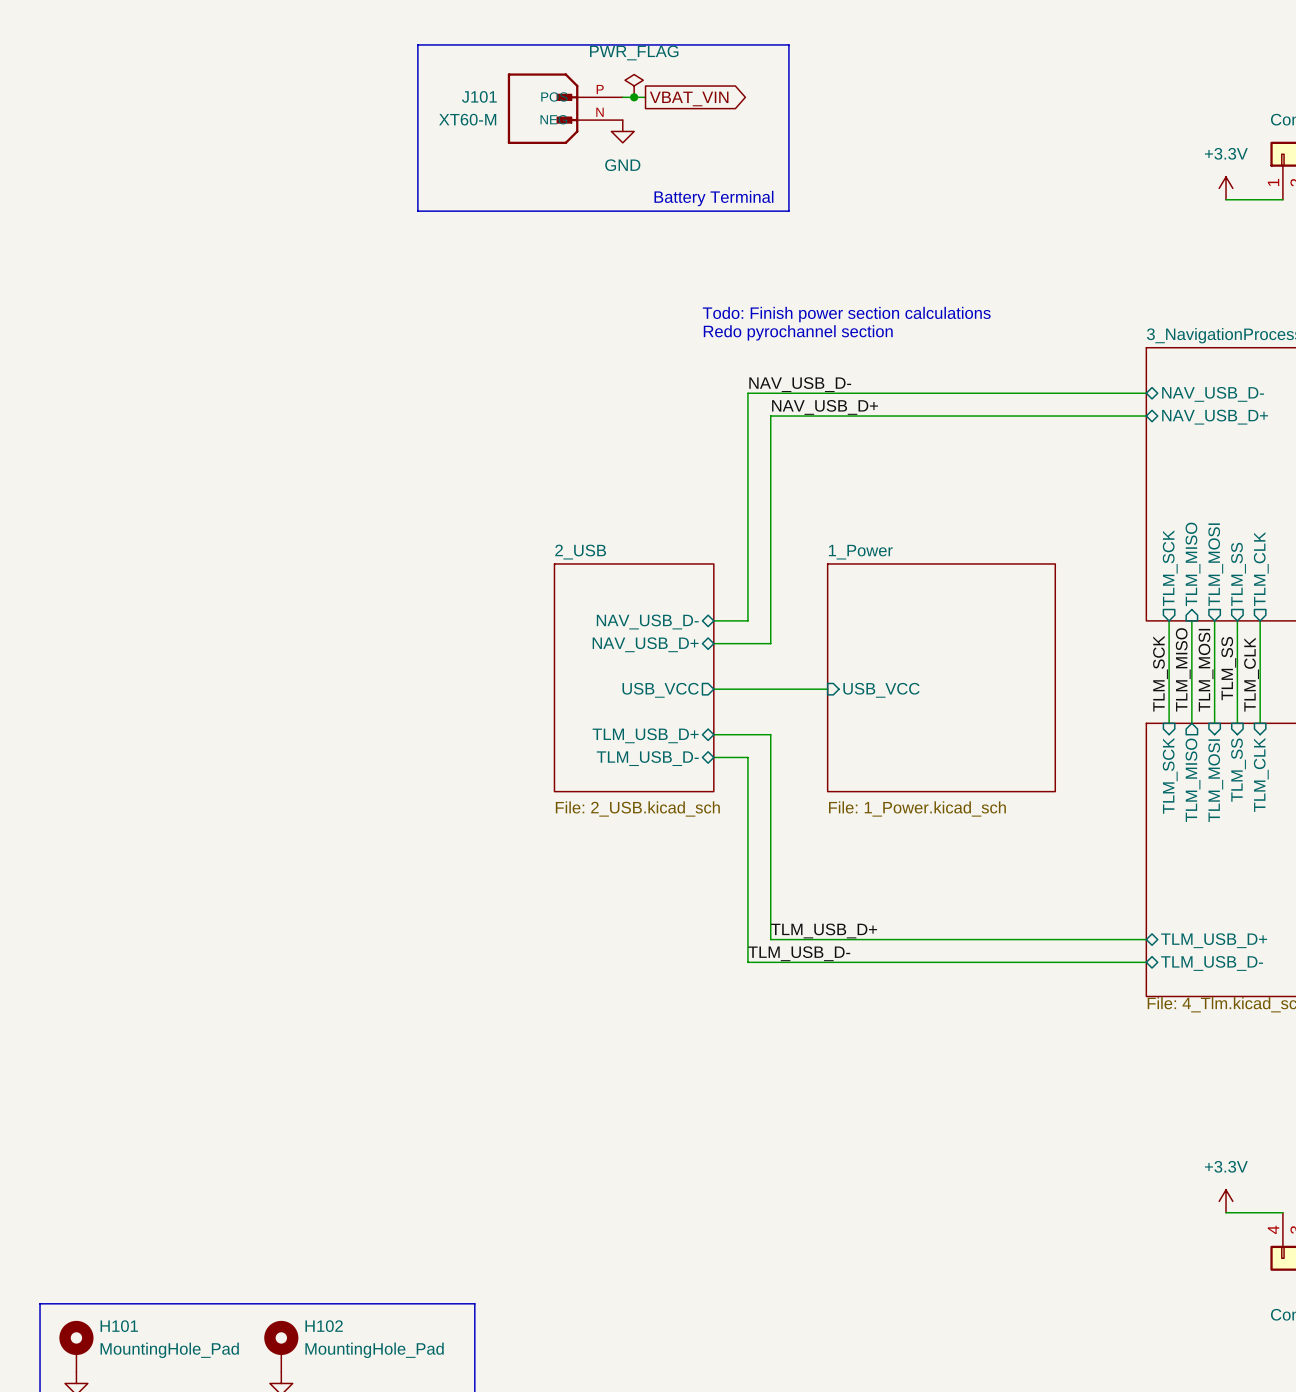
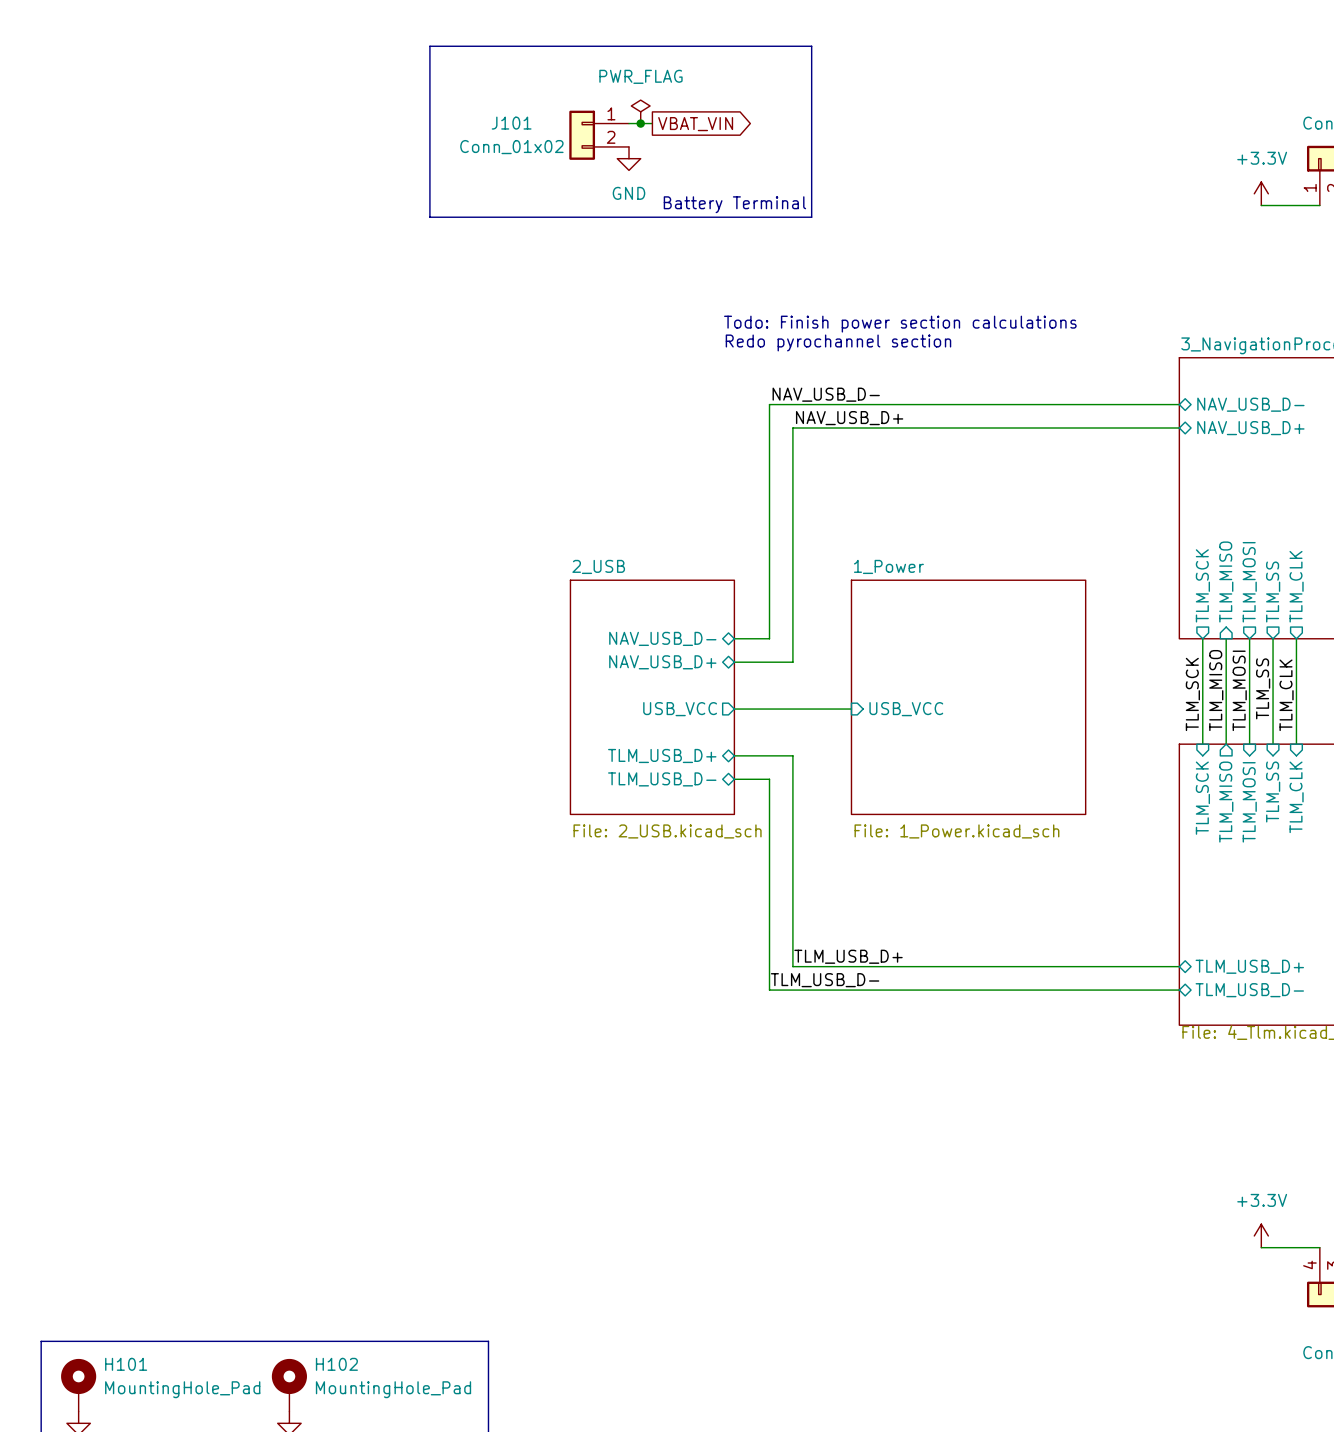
J101 symbol: [507, 73, 623, 144] -> [569, 110, 629, 160]
power symbol position: PWR_FLAG (634, 85) -> PWR_FLAG (640, 111)
junction position: (634, 97) -> (640, 123)
global label position: VBAT_VIN (689, 98) -> VBAT_VIN (695, 124)
J101 value: XT60-M (467, 119) -> Conn_01x02 (511, 147)
power symbol position: GND (622, 131) -> GND (628, 158)

